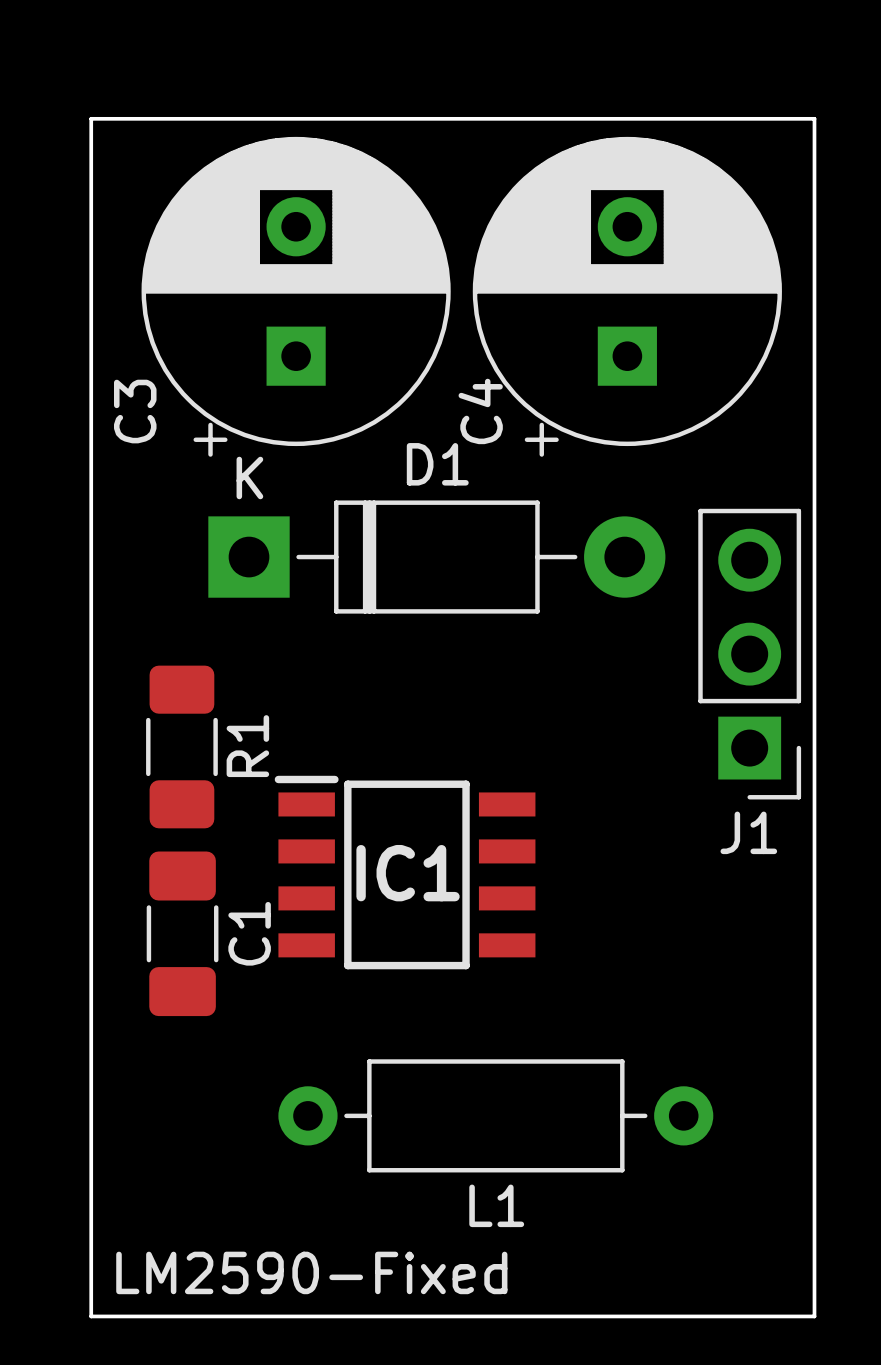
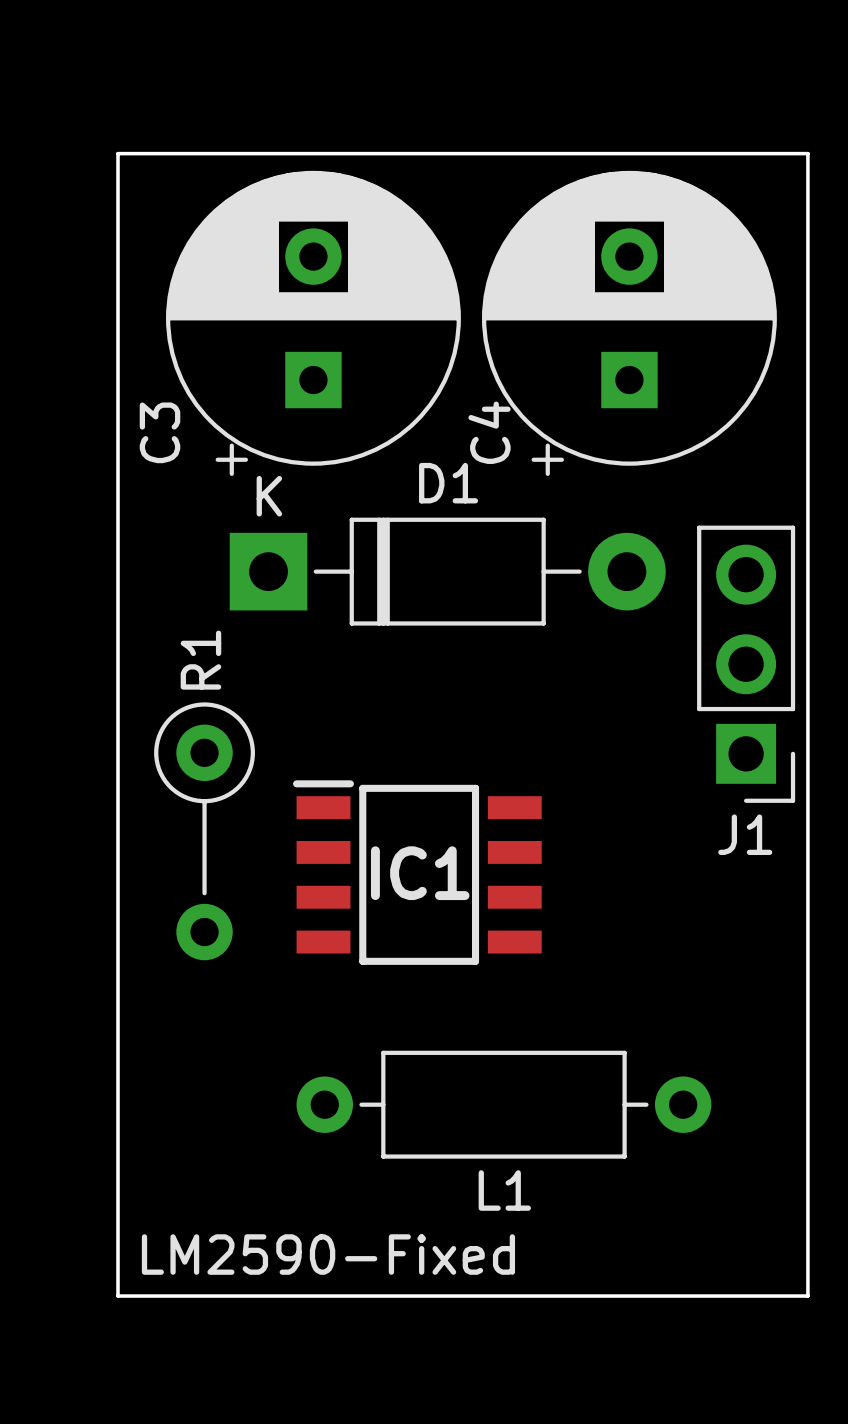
R1 footprint: [146, 665, 218, 829] -> [154, 702, 255, 961]
R1 name position: R1 (247, 746) -> R1 (200, 660)
C1: (182, 933) -> none

